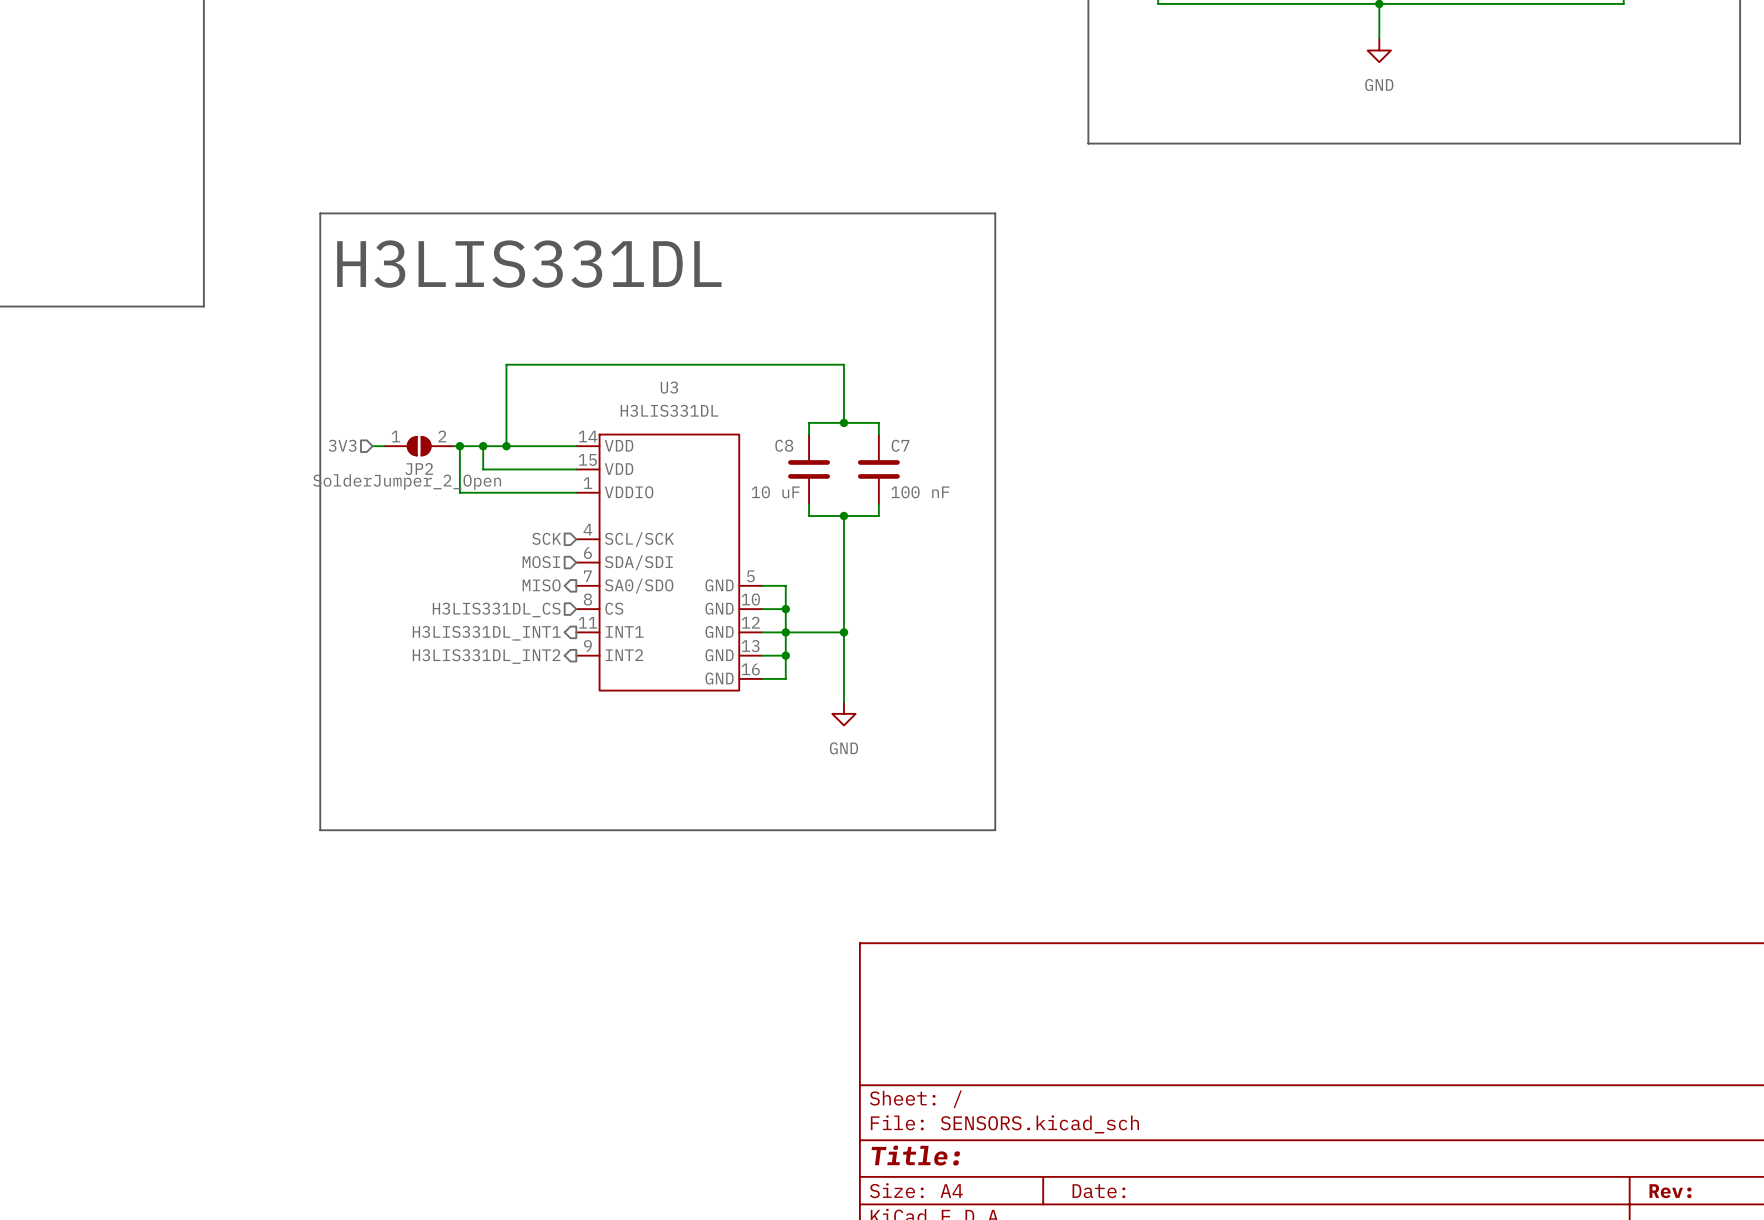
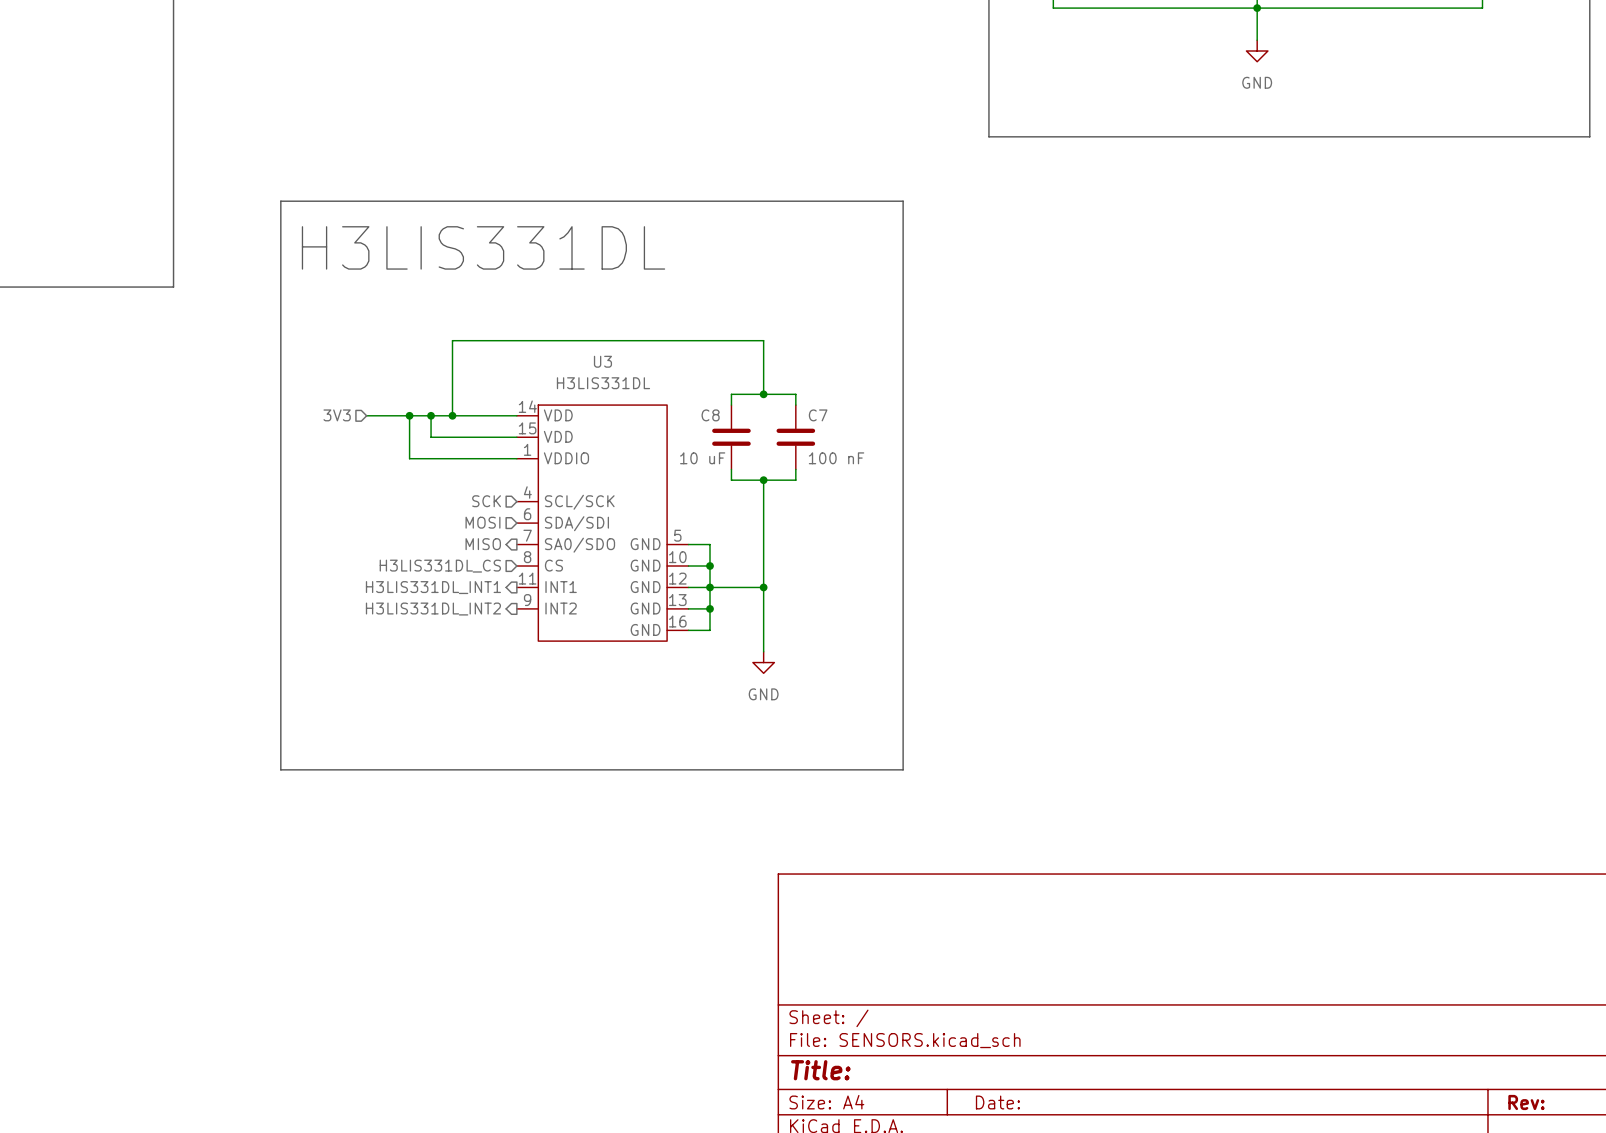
hierarchical label position: 3V3 (342, 445) -> 3V3 (337, 415)
wire: (372, 446) (384, 446) -> none
JP2: SolderJumper_2_Open (419, 446) -> none

